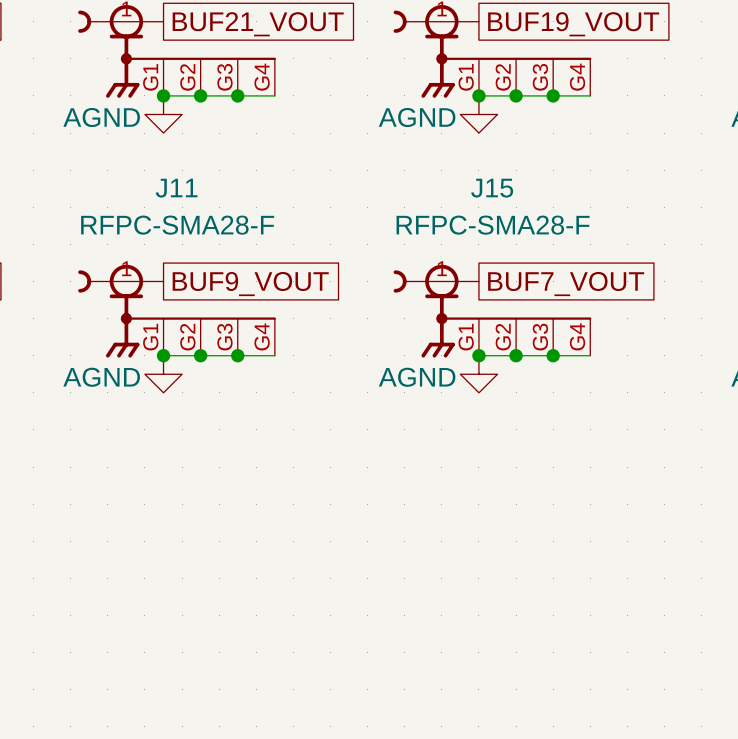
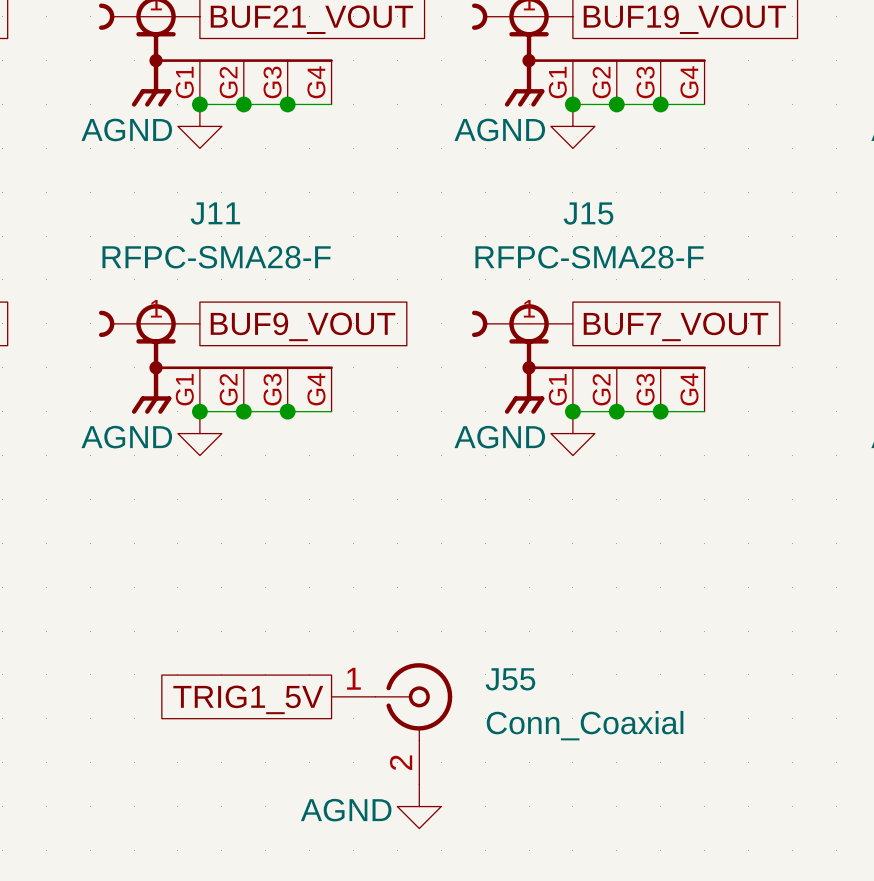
global label: none -> TRIG1_5V (248, 699)
J55: none -> Conn_Coaxial (391, 723)
power symbol: none -> AGND (419, 806)

